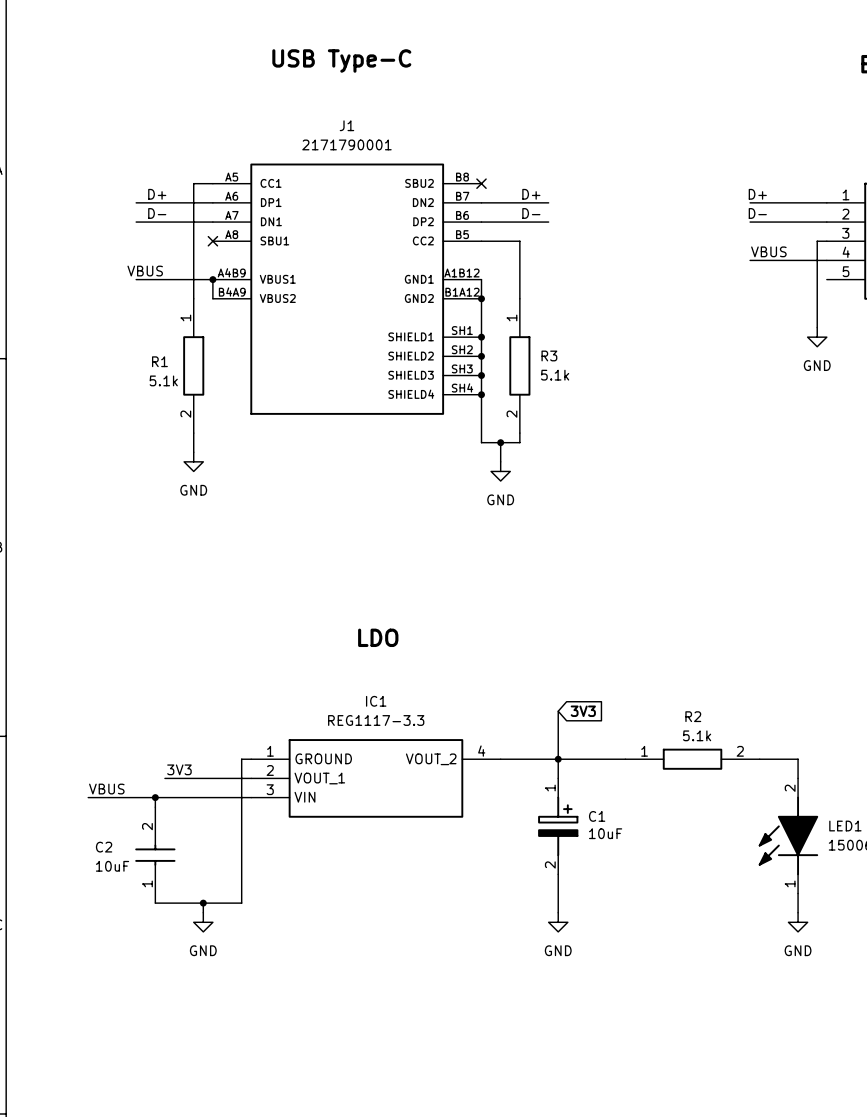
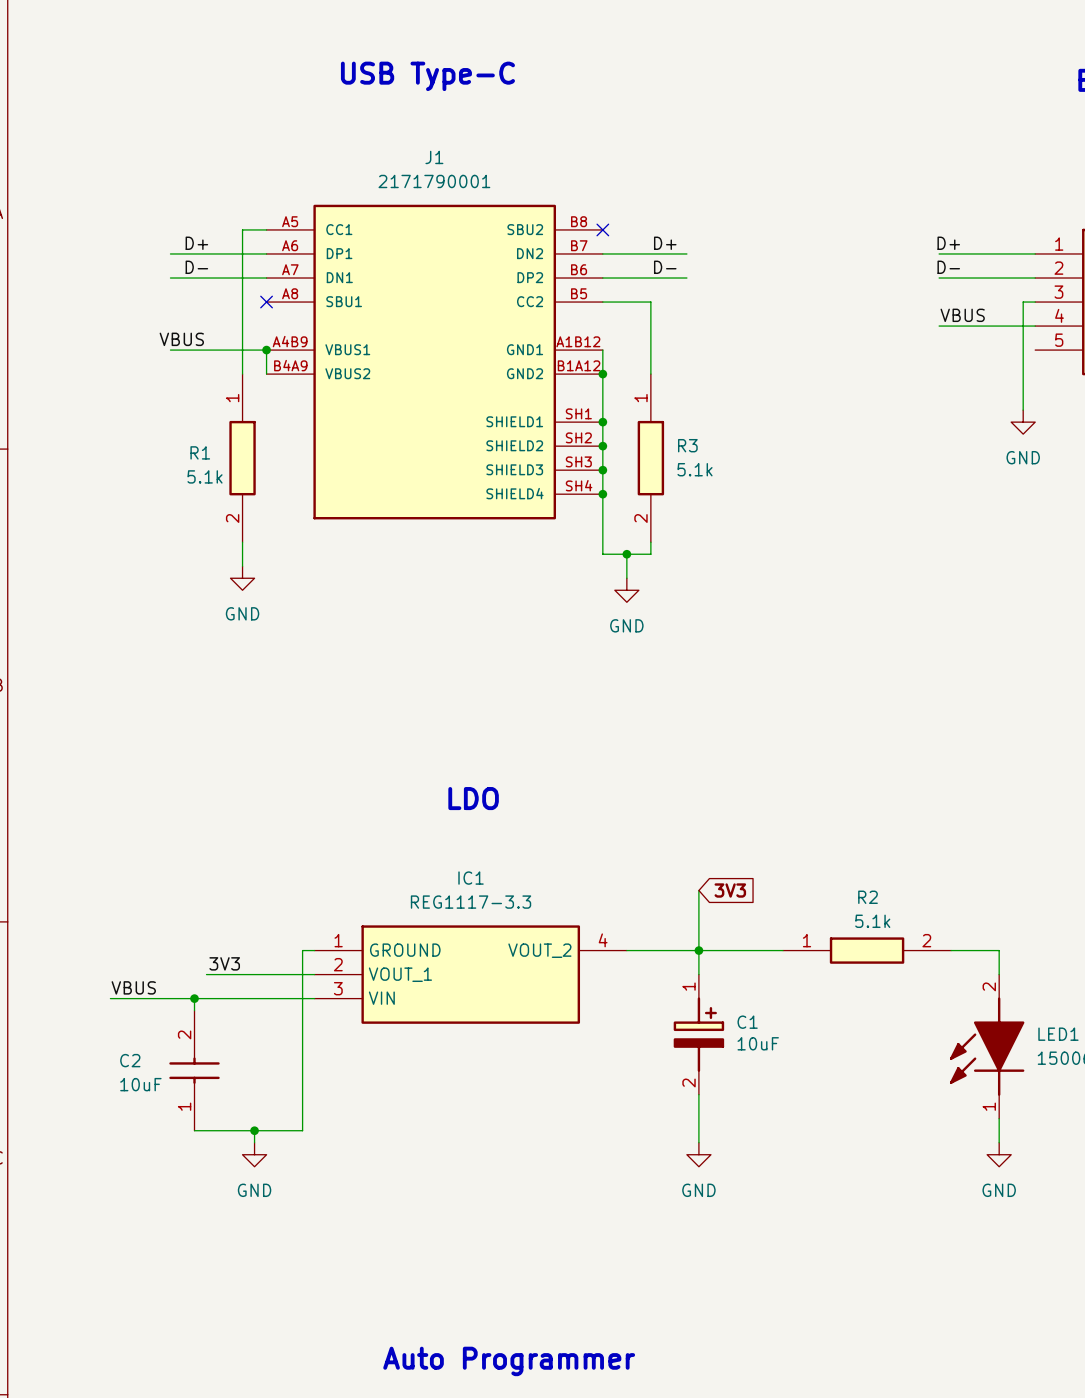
text: none -> Auto Programmer (509, 1361)

